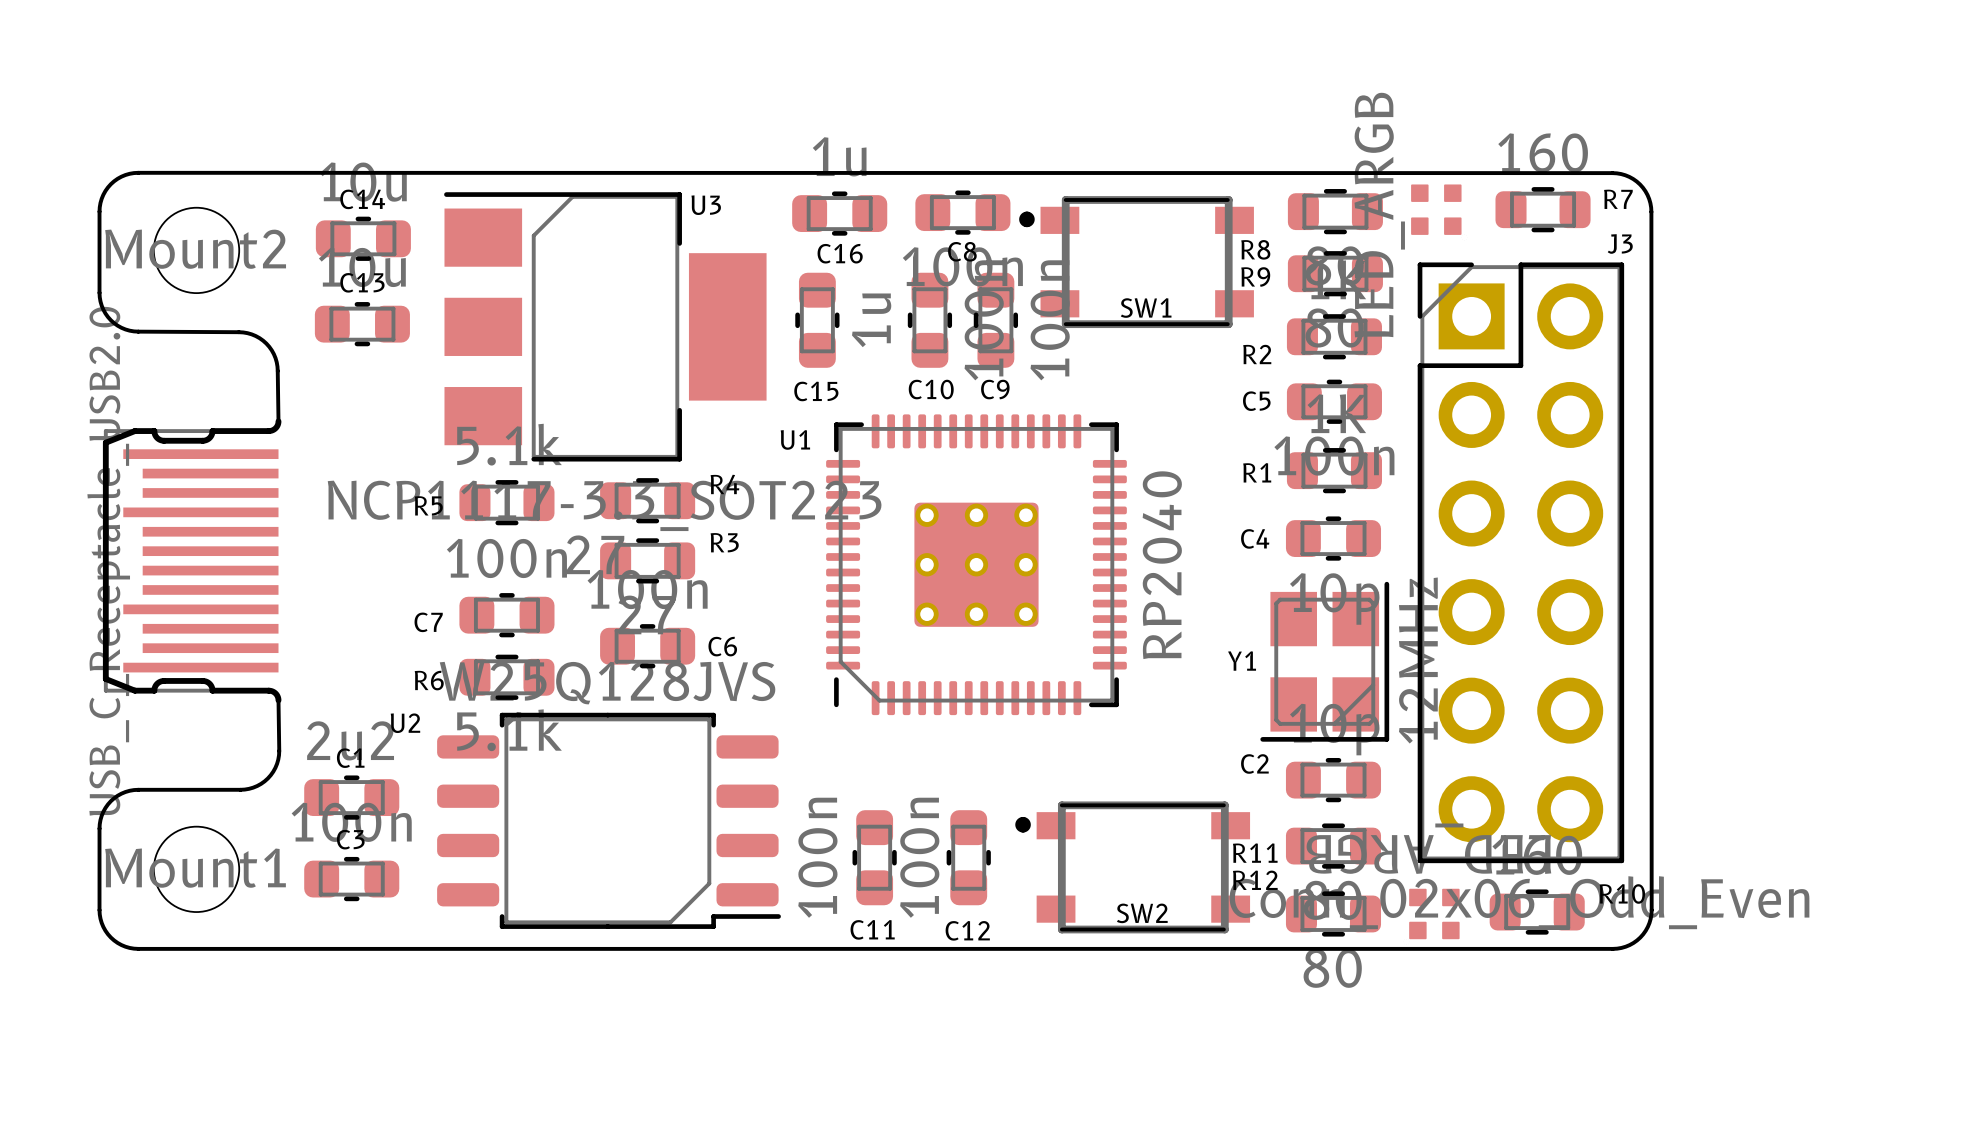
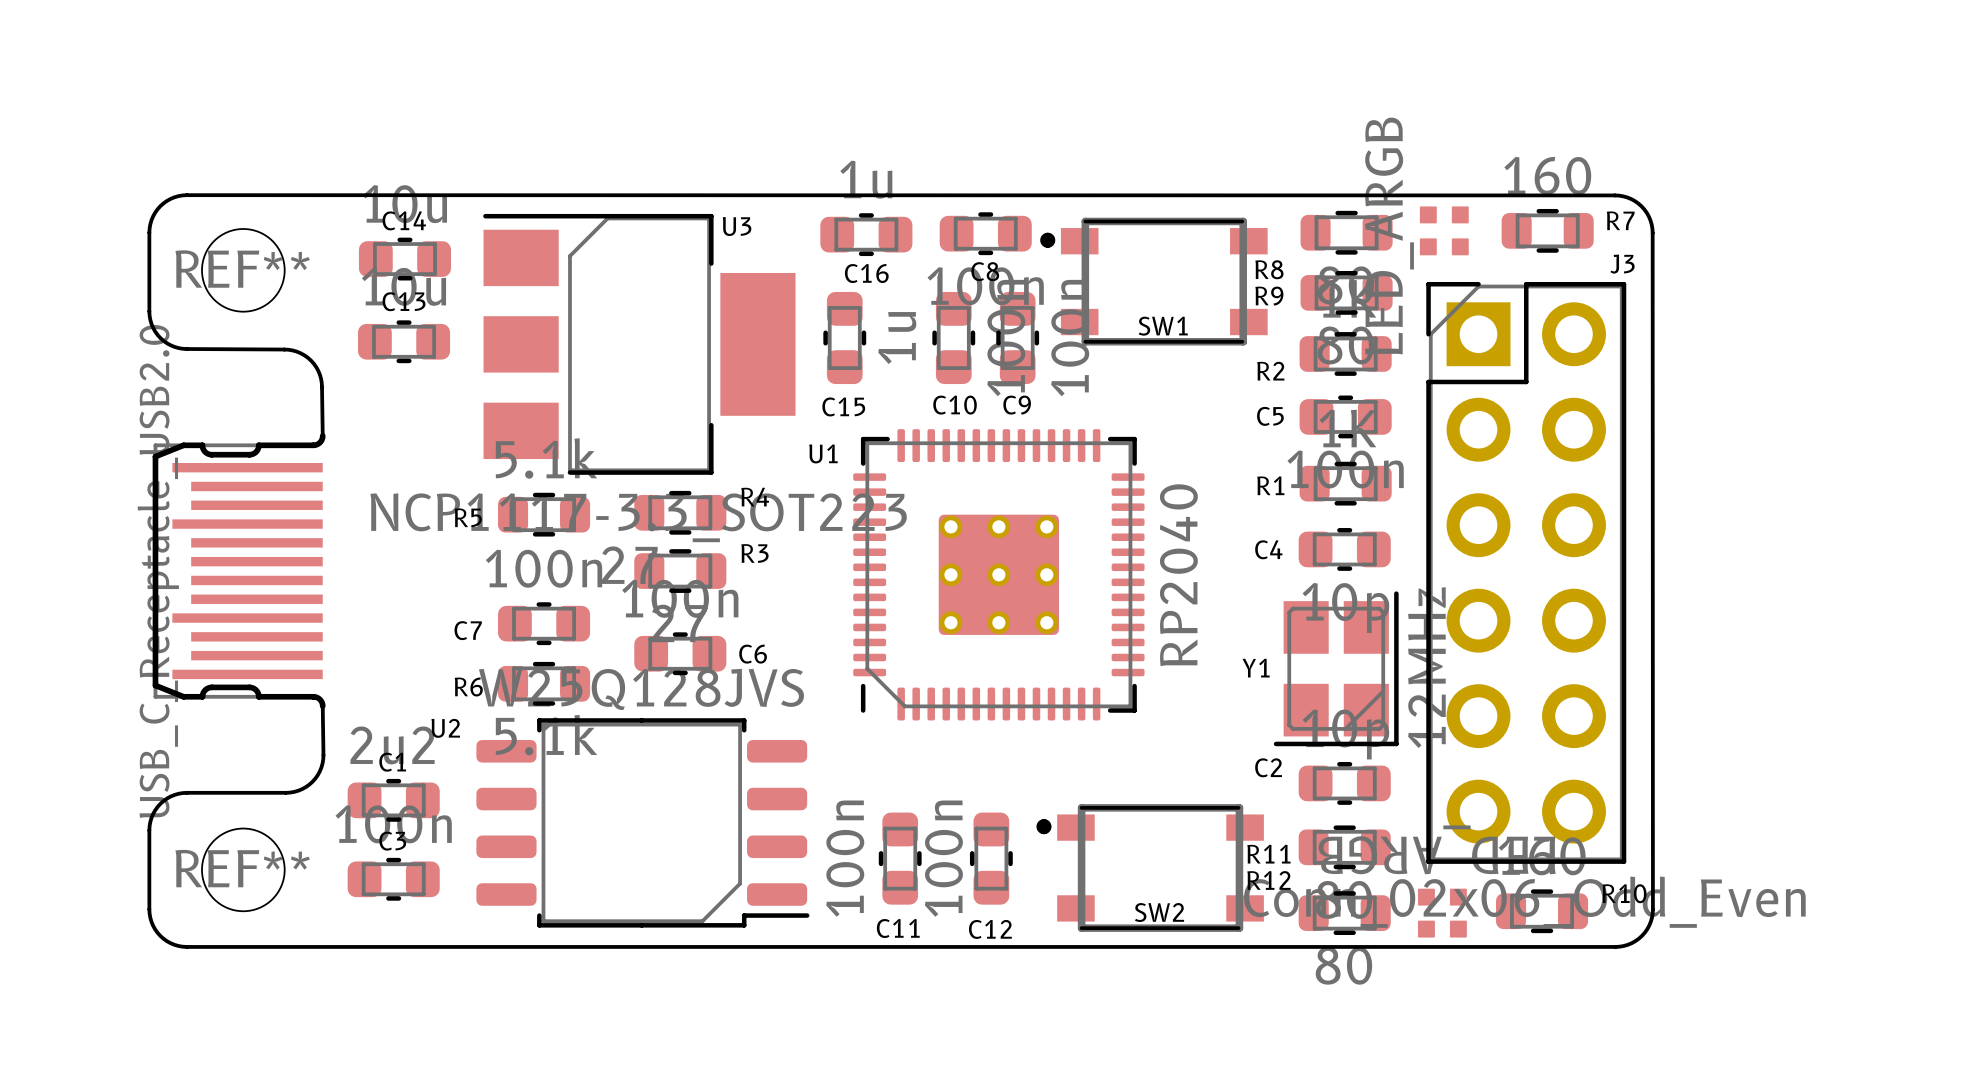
REF** text: Mount2 (195, 249) -> none
REF** name: none -> REF** (242, 269)
REF** text: Mount1 (195, 868) -> none
REF** name: none -> REF** (242, 868)

